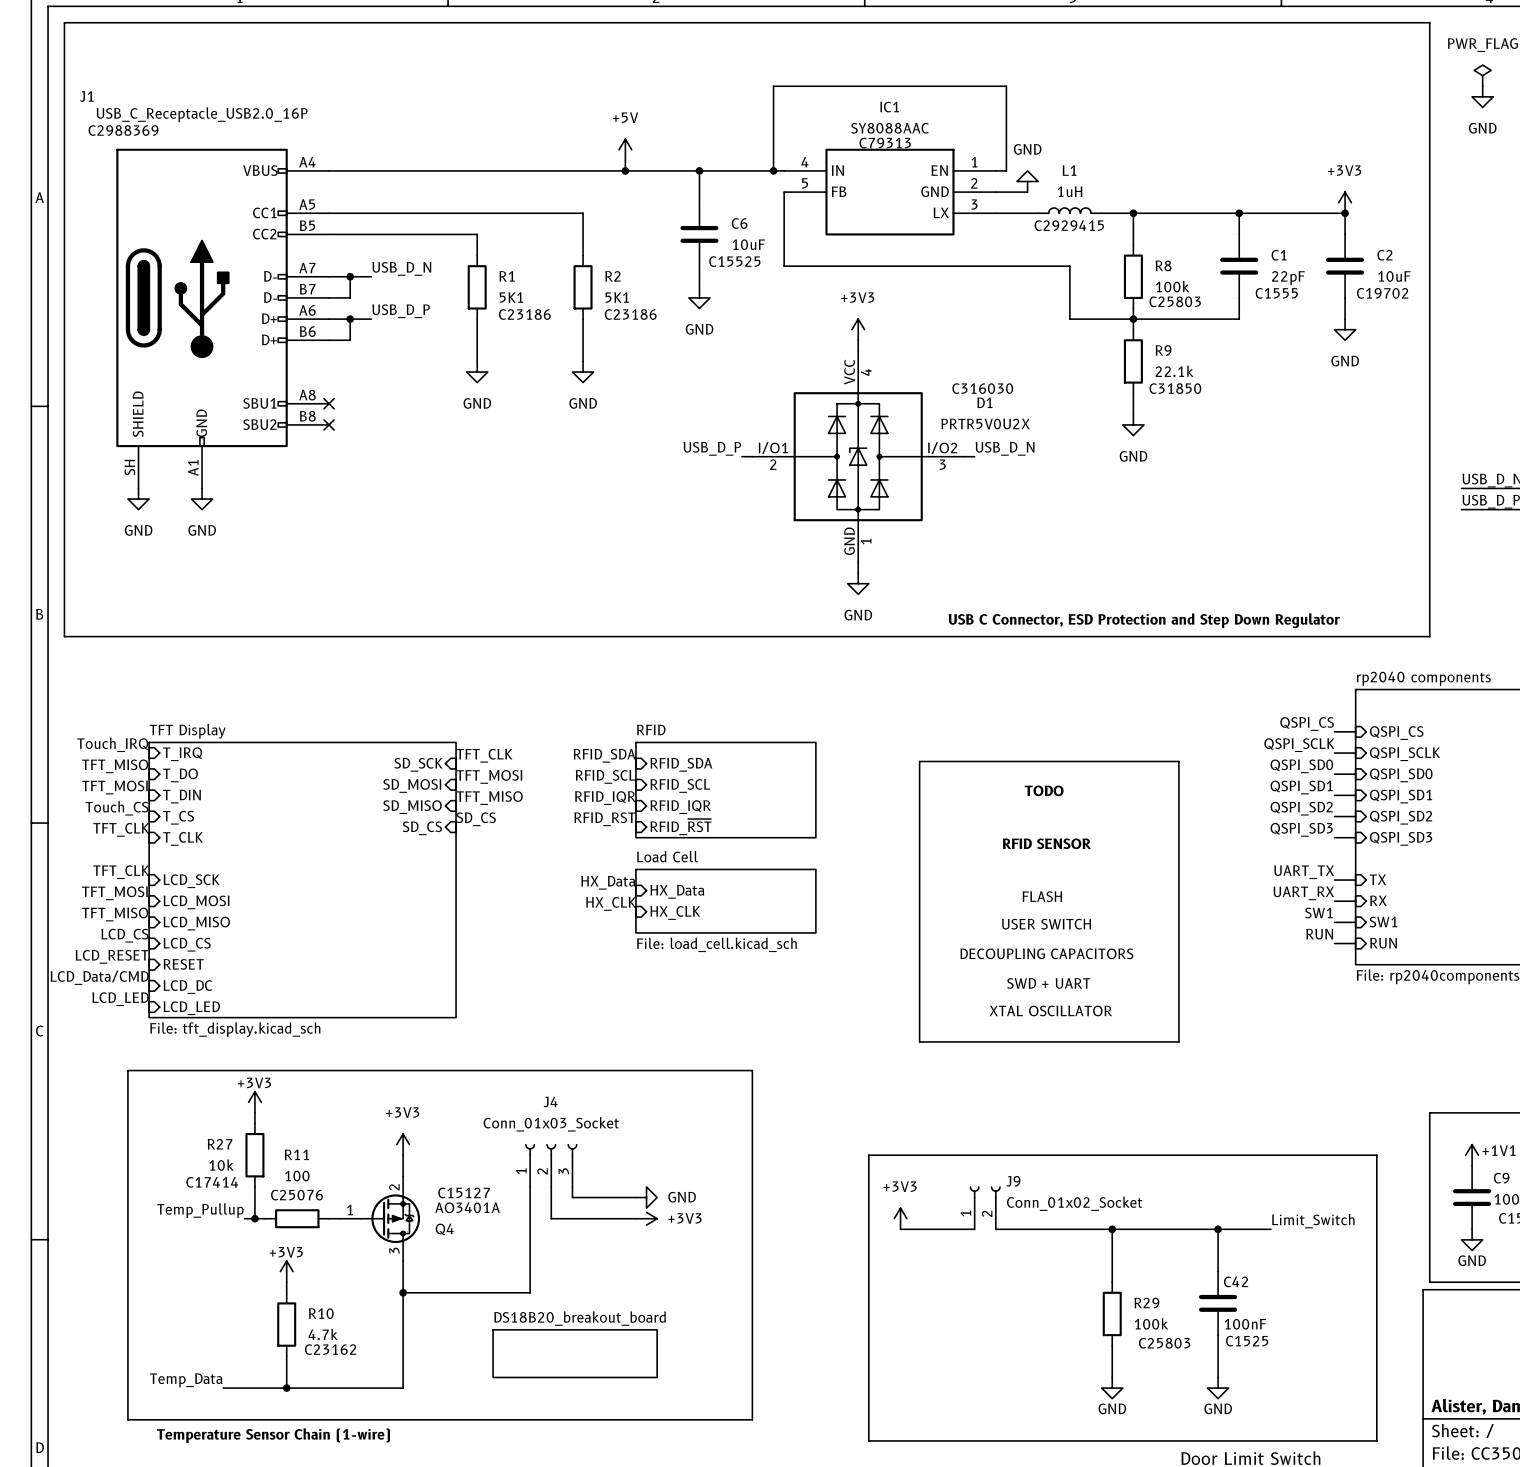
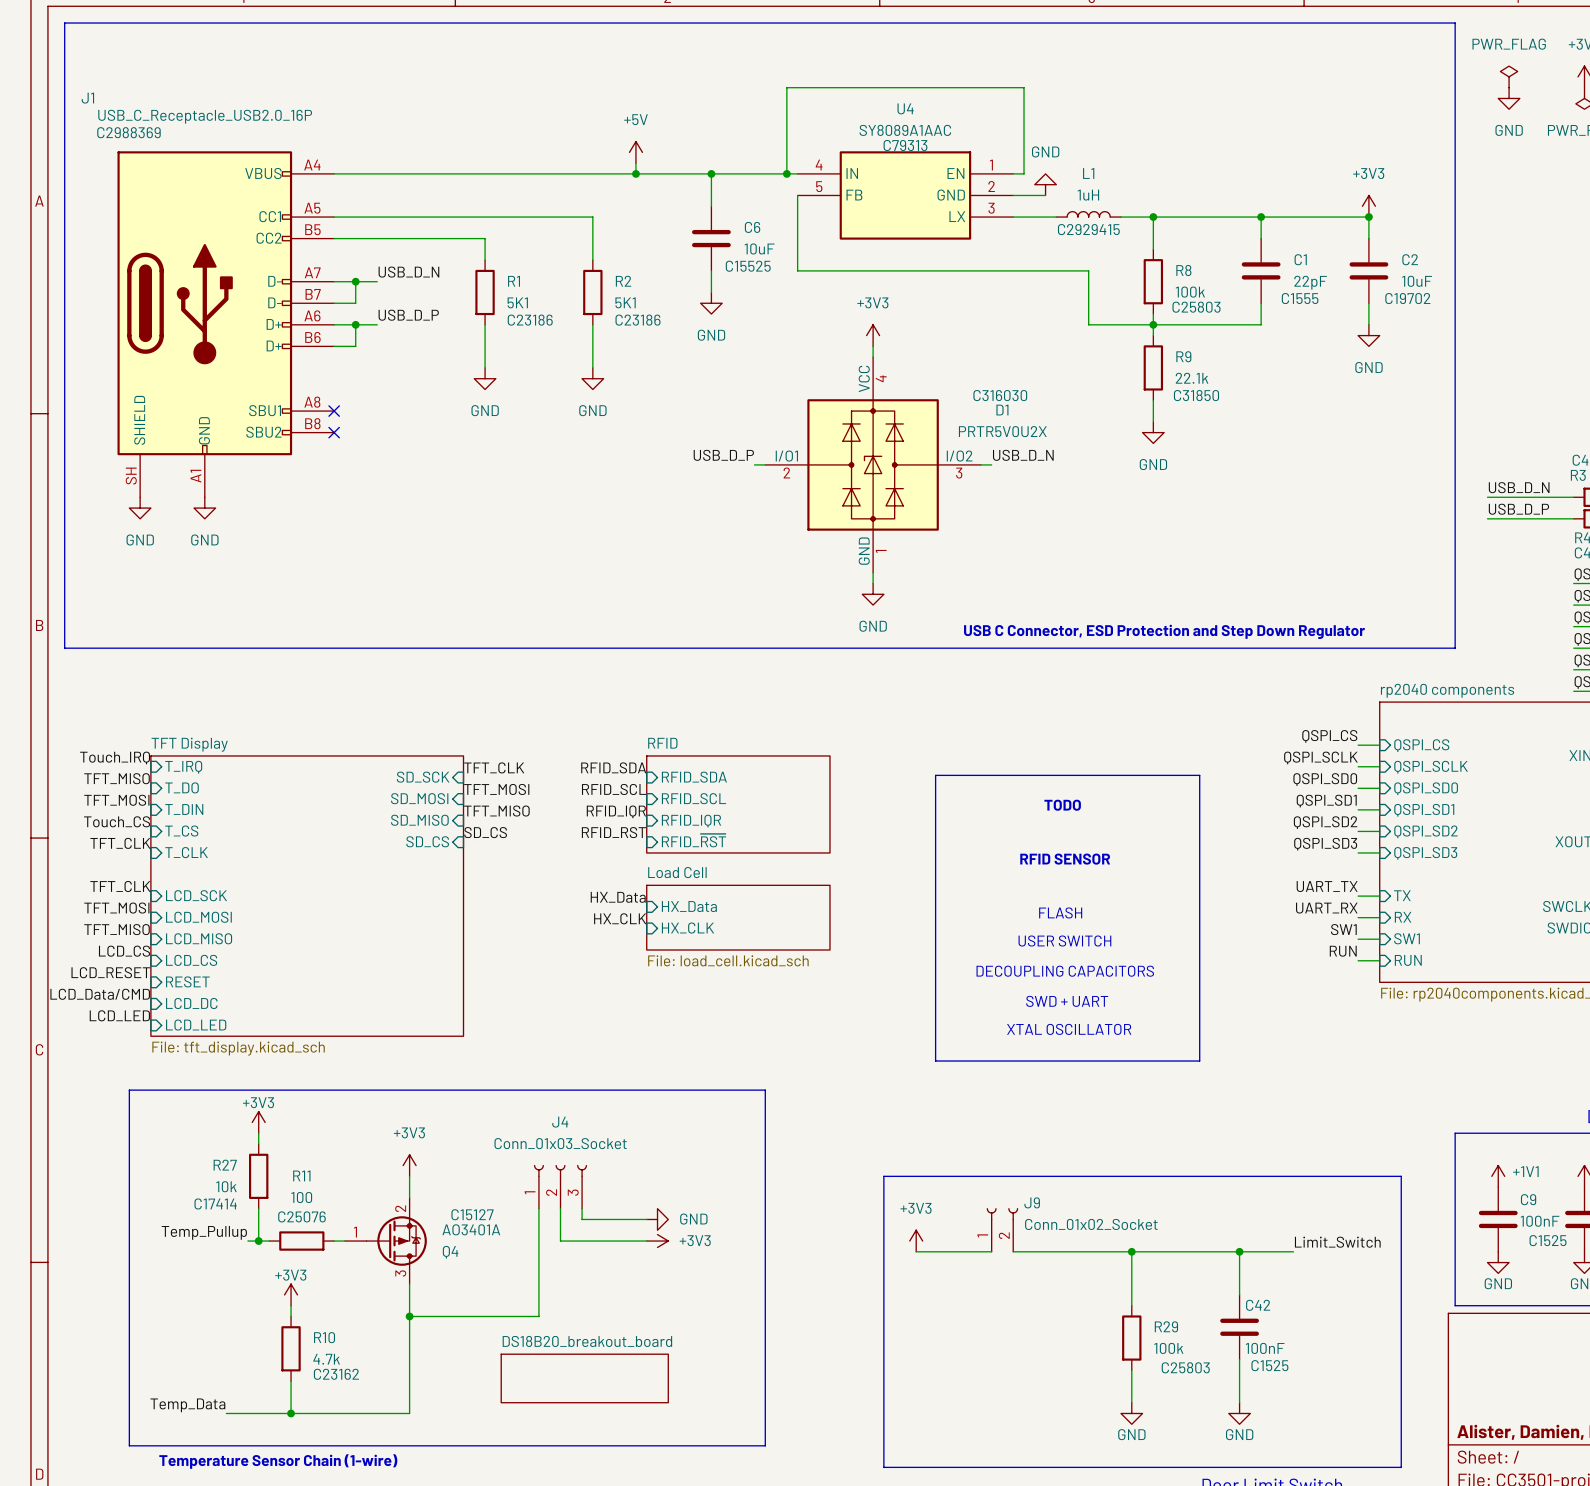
IC1 name: IC1 (889, 107) -> U4 (905, 108)
IC1 value: SY8088AAC (889, 128) -> SY8089A1AAC (905, 130)
IC1 text: C79313 (885, 143) -> none
IC1 text: none -> C79313 (905, 145)

